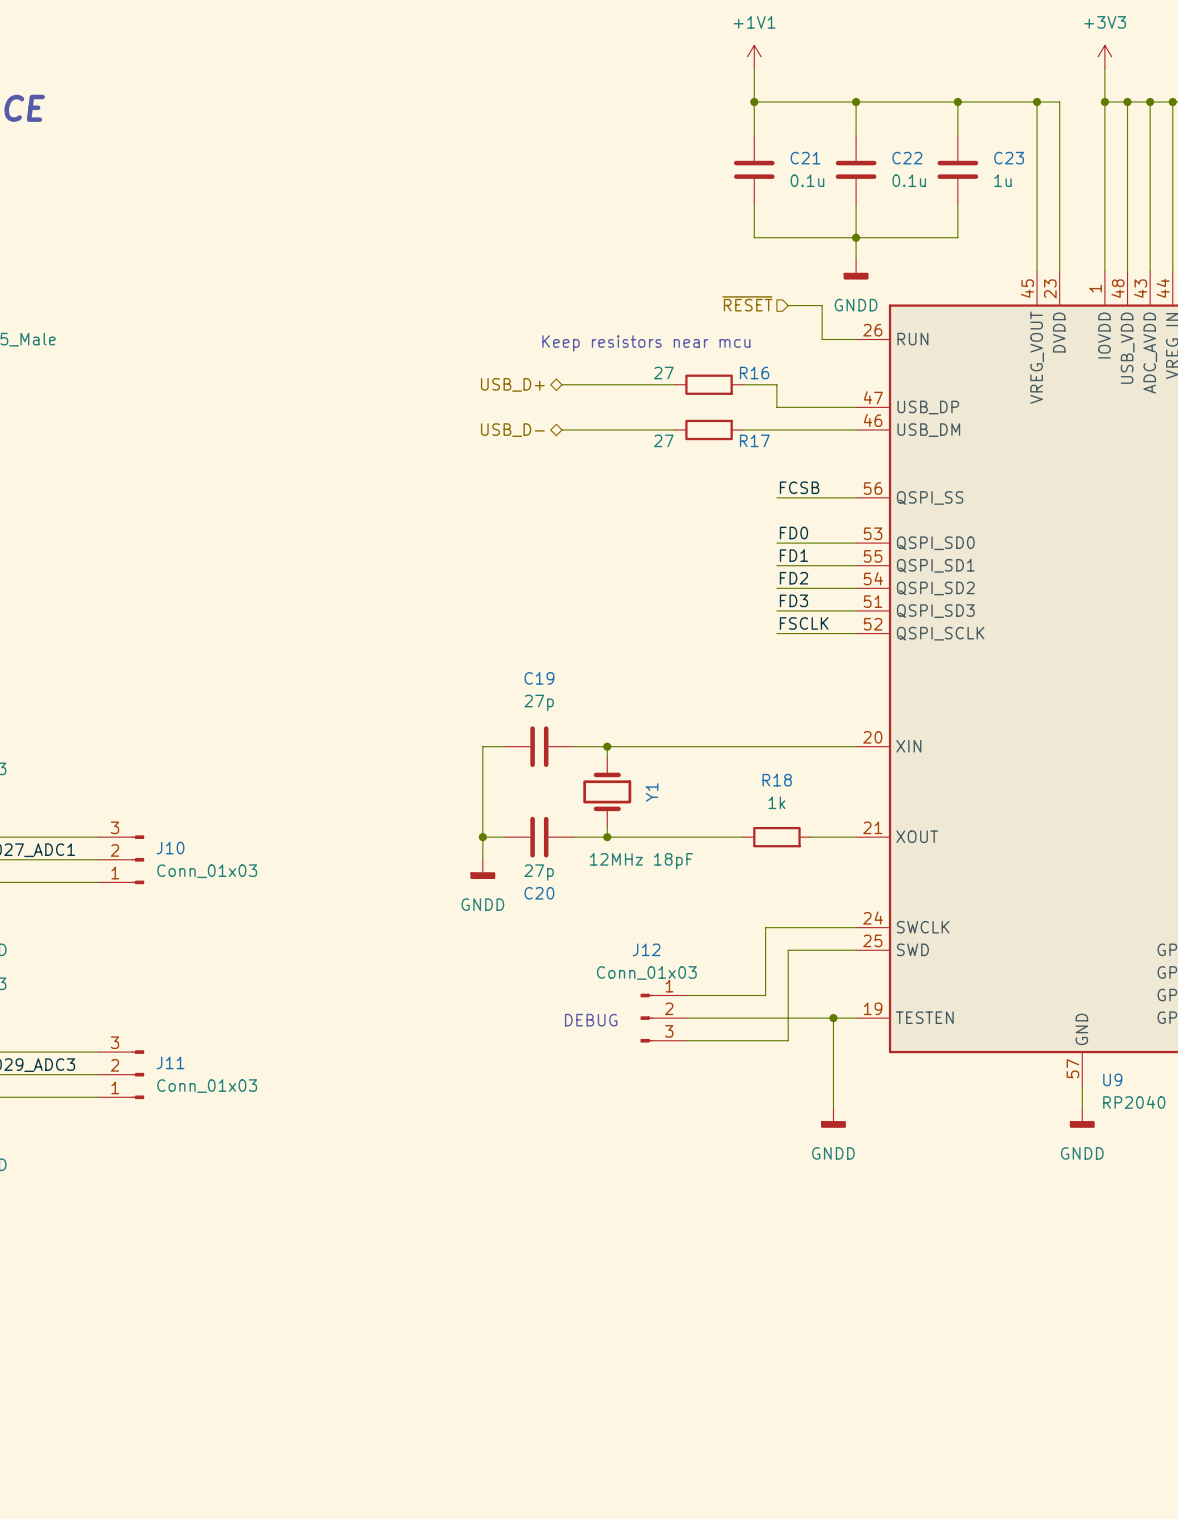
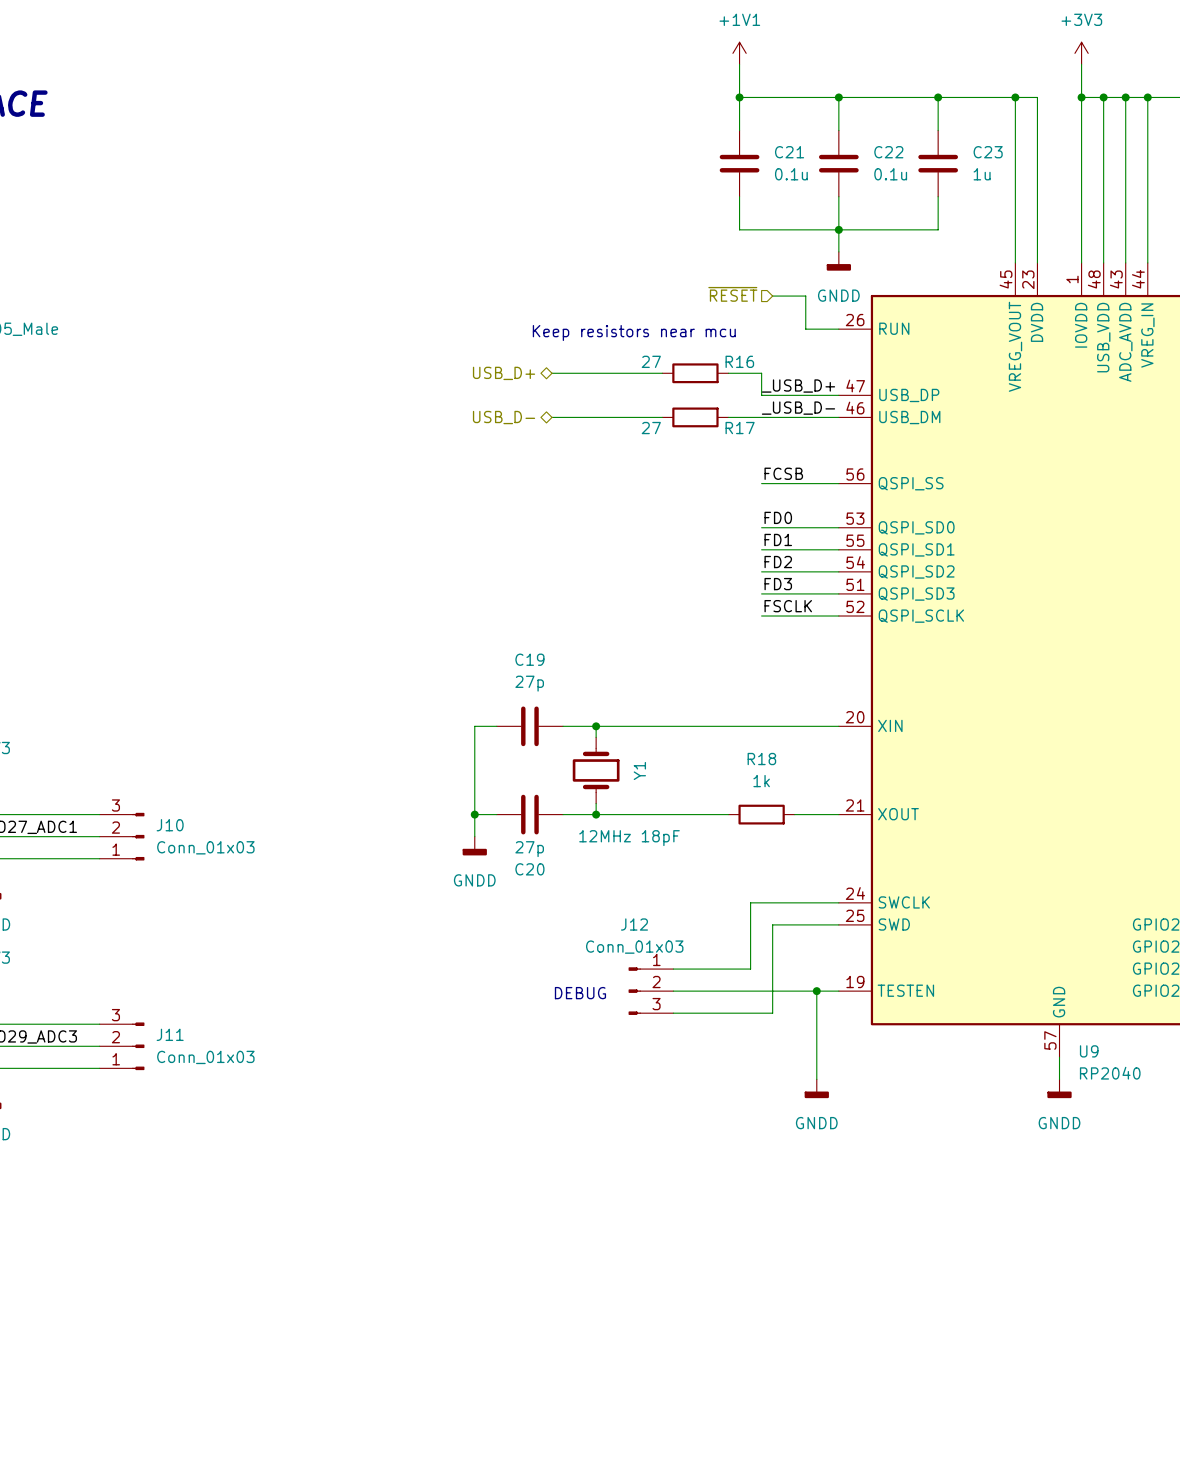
label: none -> _USB_D+ (798, 386)
label: none -> _USB_D- (798, 408)

